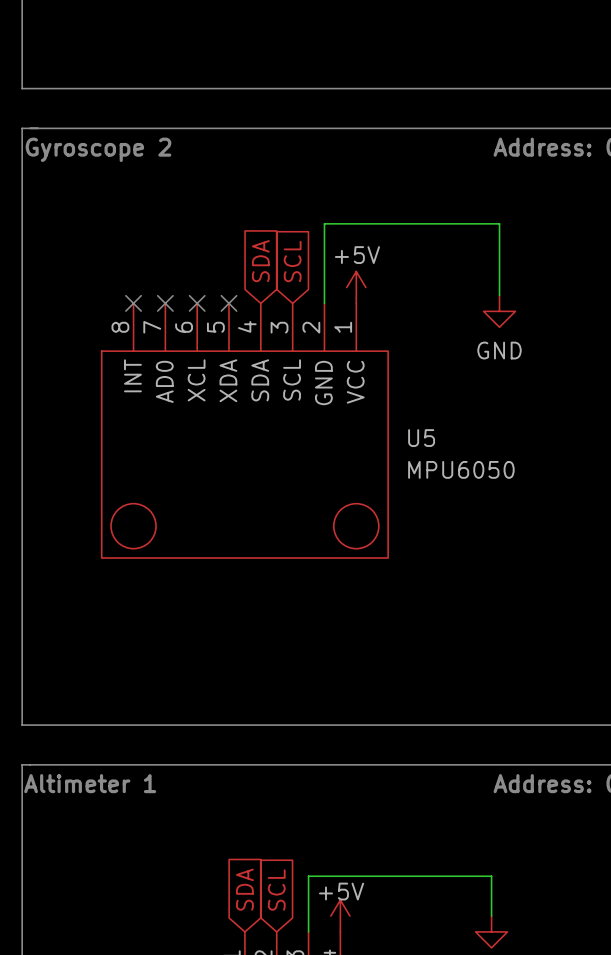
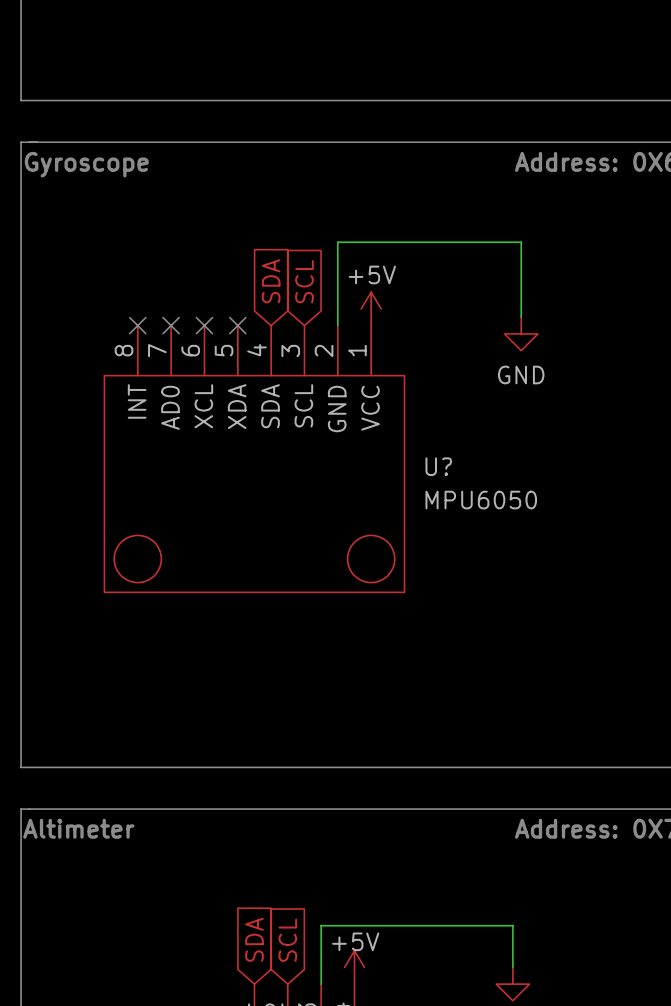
text: Gyroscope 2 (98, 149) -> Gyroscope (86, 164)
U5 name: U5 (421, 438) -> U? (438, 466)
text: Altimeter 1 (90, 783) -> Altimeter (78, 828)

